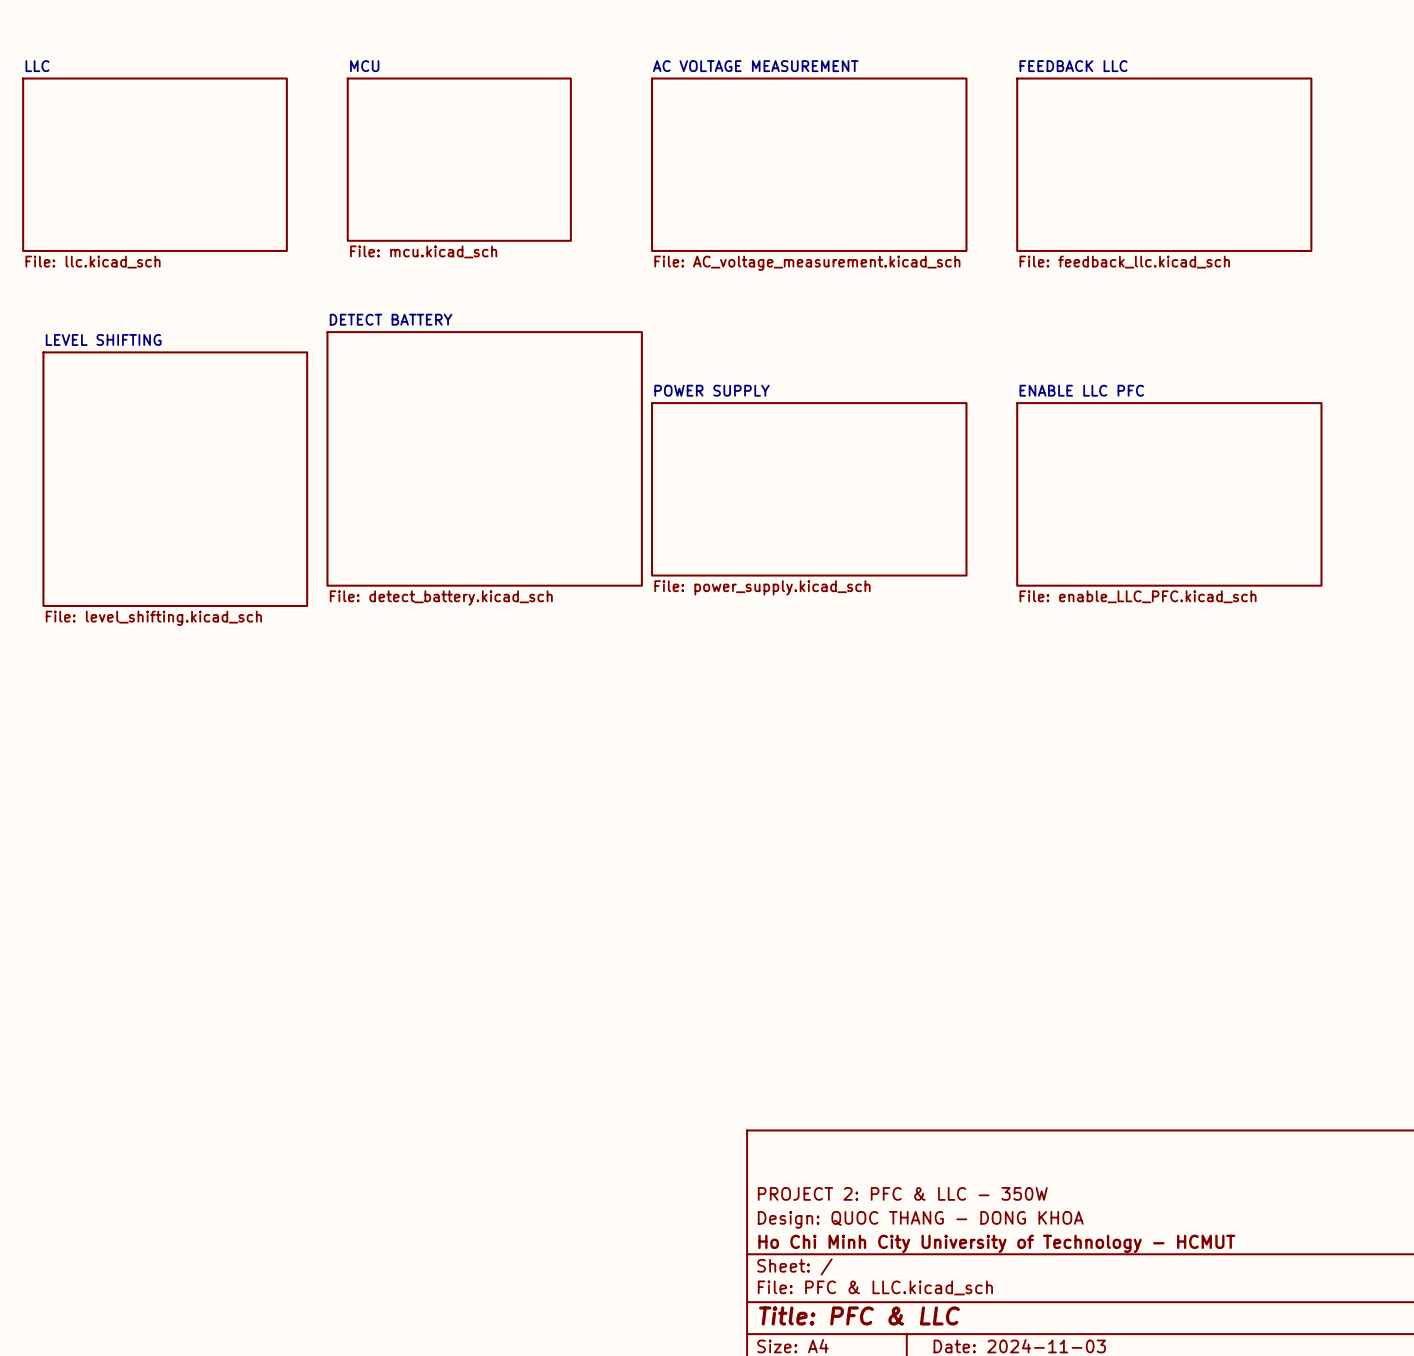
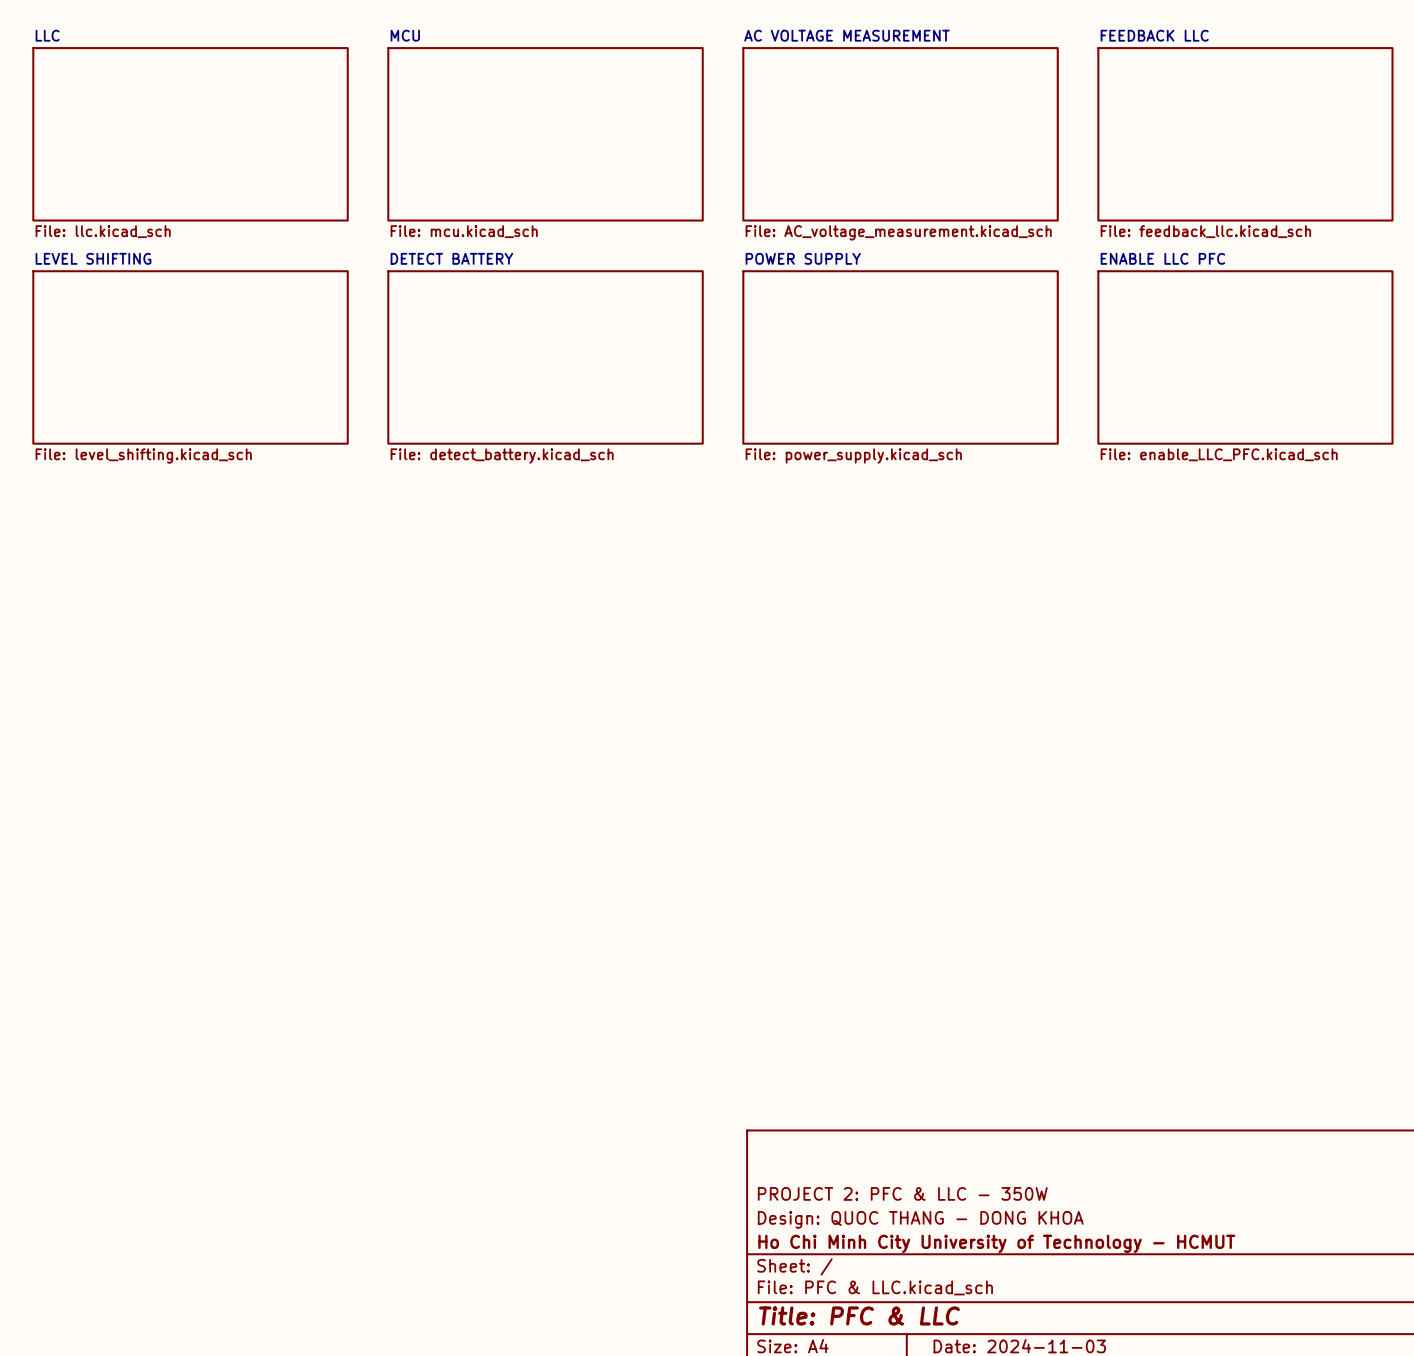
sheet LLC: none -> File: llc.kicad_sch (190, 134)
sheet MCU: none -> File: mcu.kicad_sch (545, 134)
sheet MCU: File: mcu.kicad_sch (459, 159) -> none
sheet LLC: File: llc.kicad_sch (155, 164) -> none
sheet AC VOLTAGE MEASUREMENT position: (809, 164) -> (900, 134)
sheet FEEDBACK LLC position: (1164, 164) -> (1245, 134)
sheet LEVEL SHIFTING: none -> File: level_shifting.kicad_sch (190, 357)
sheet DETECT BATTERY: none -> File: detect_battery.kicad_sch (545, 357)
sheet ENABLE LLC PFC: none -> File: enable_LLC_PFC.kicad_sch (1245, 357)
sheet DETECT BATTERY: File: detect_battery.kicad_sch (484, 458) -> none
sheet LEVEL SHIFTING: File: level_shifting.kicad_sch (175, 479) -> none
sheet POWER SUPPLY position: (809, 489) -> (900, 357)
sheet ENABLE LLC PFC: File: enable_LLC_PFC.kicad_sch (1169, 494) -> none

